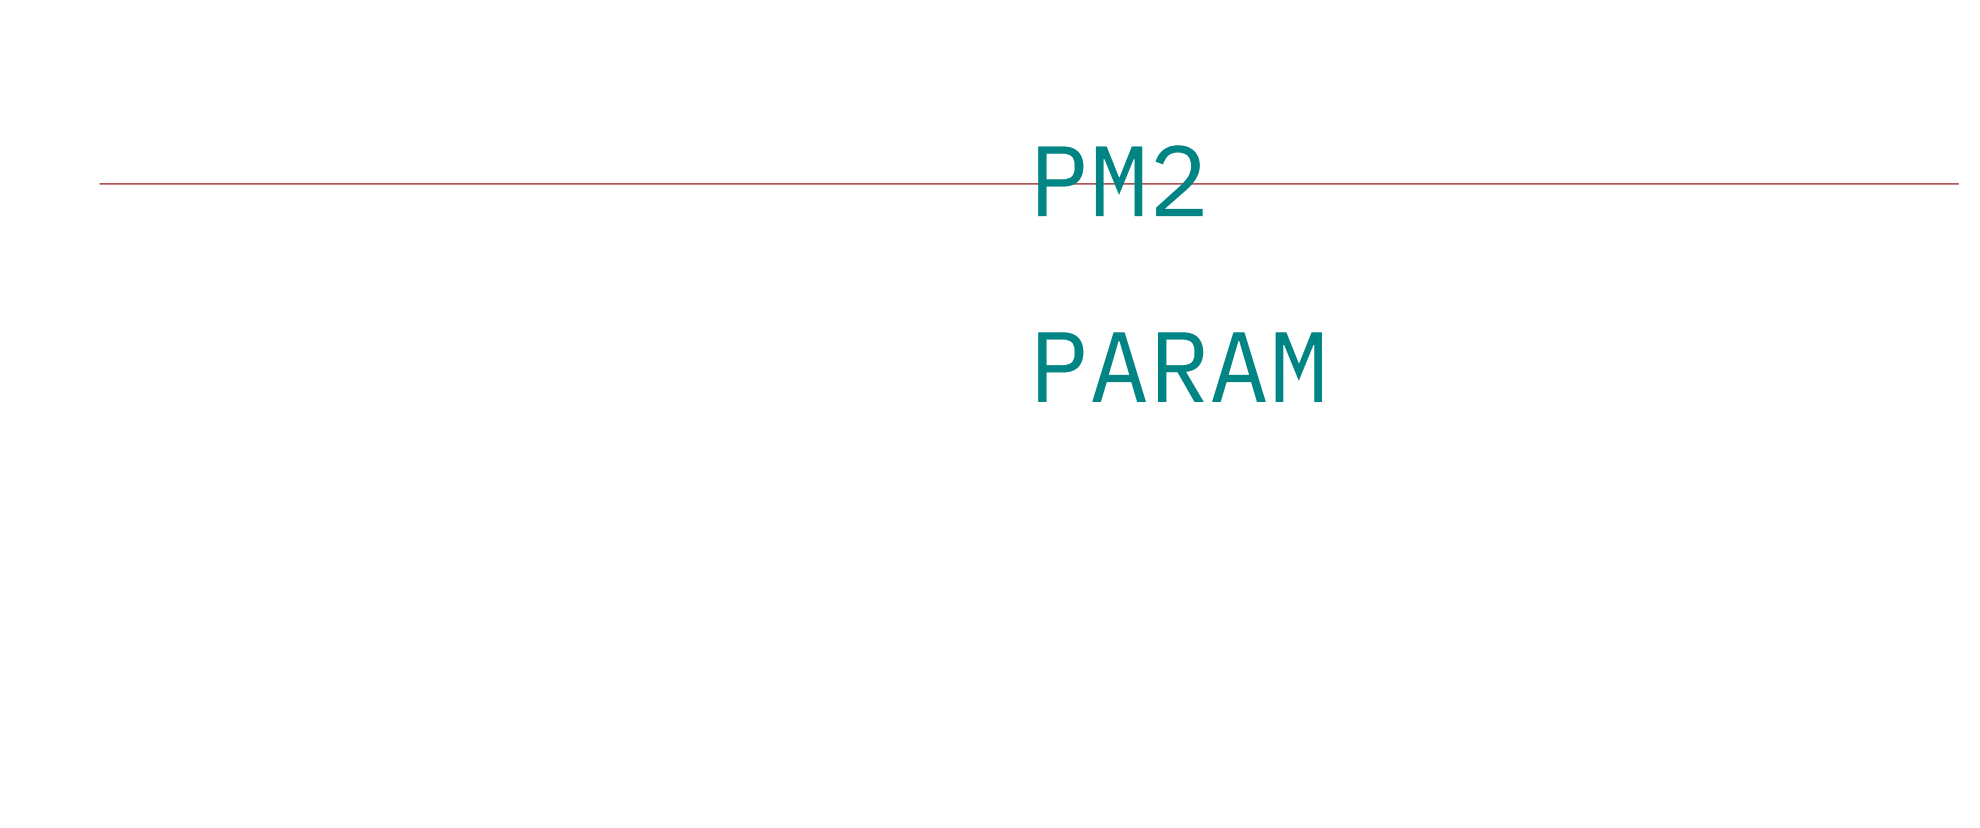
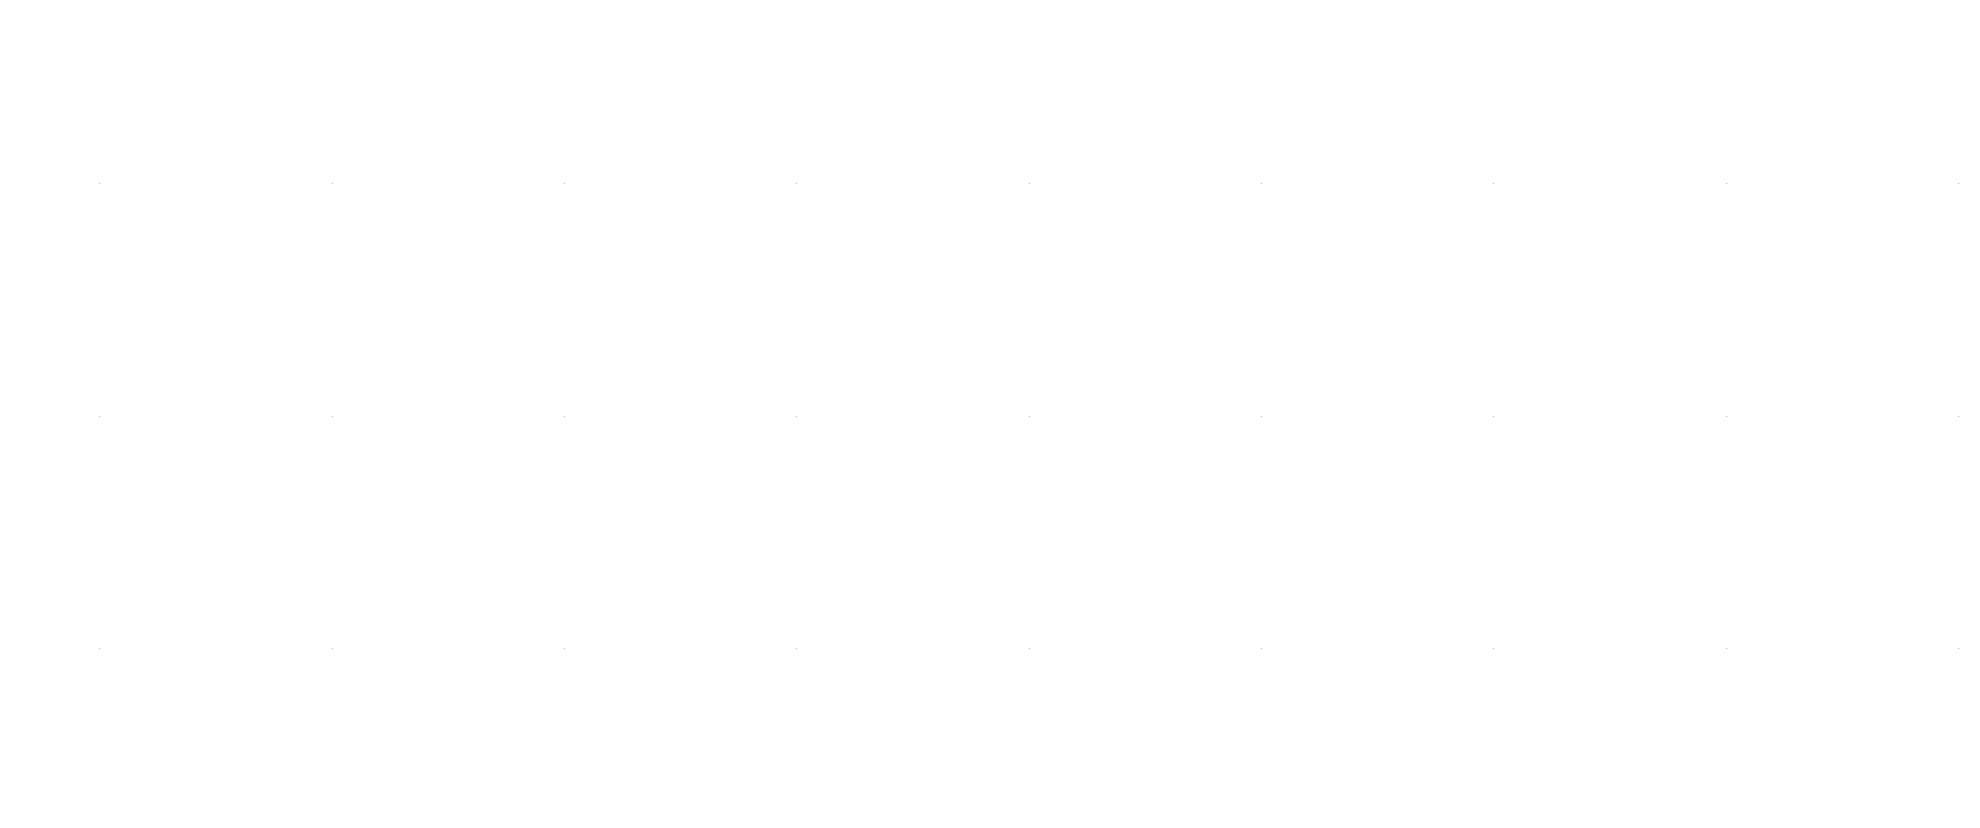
PM2: PARAM (1029, 183) -> none

